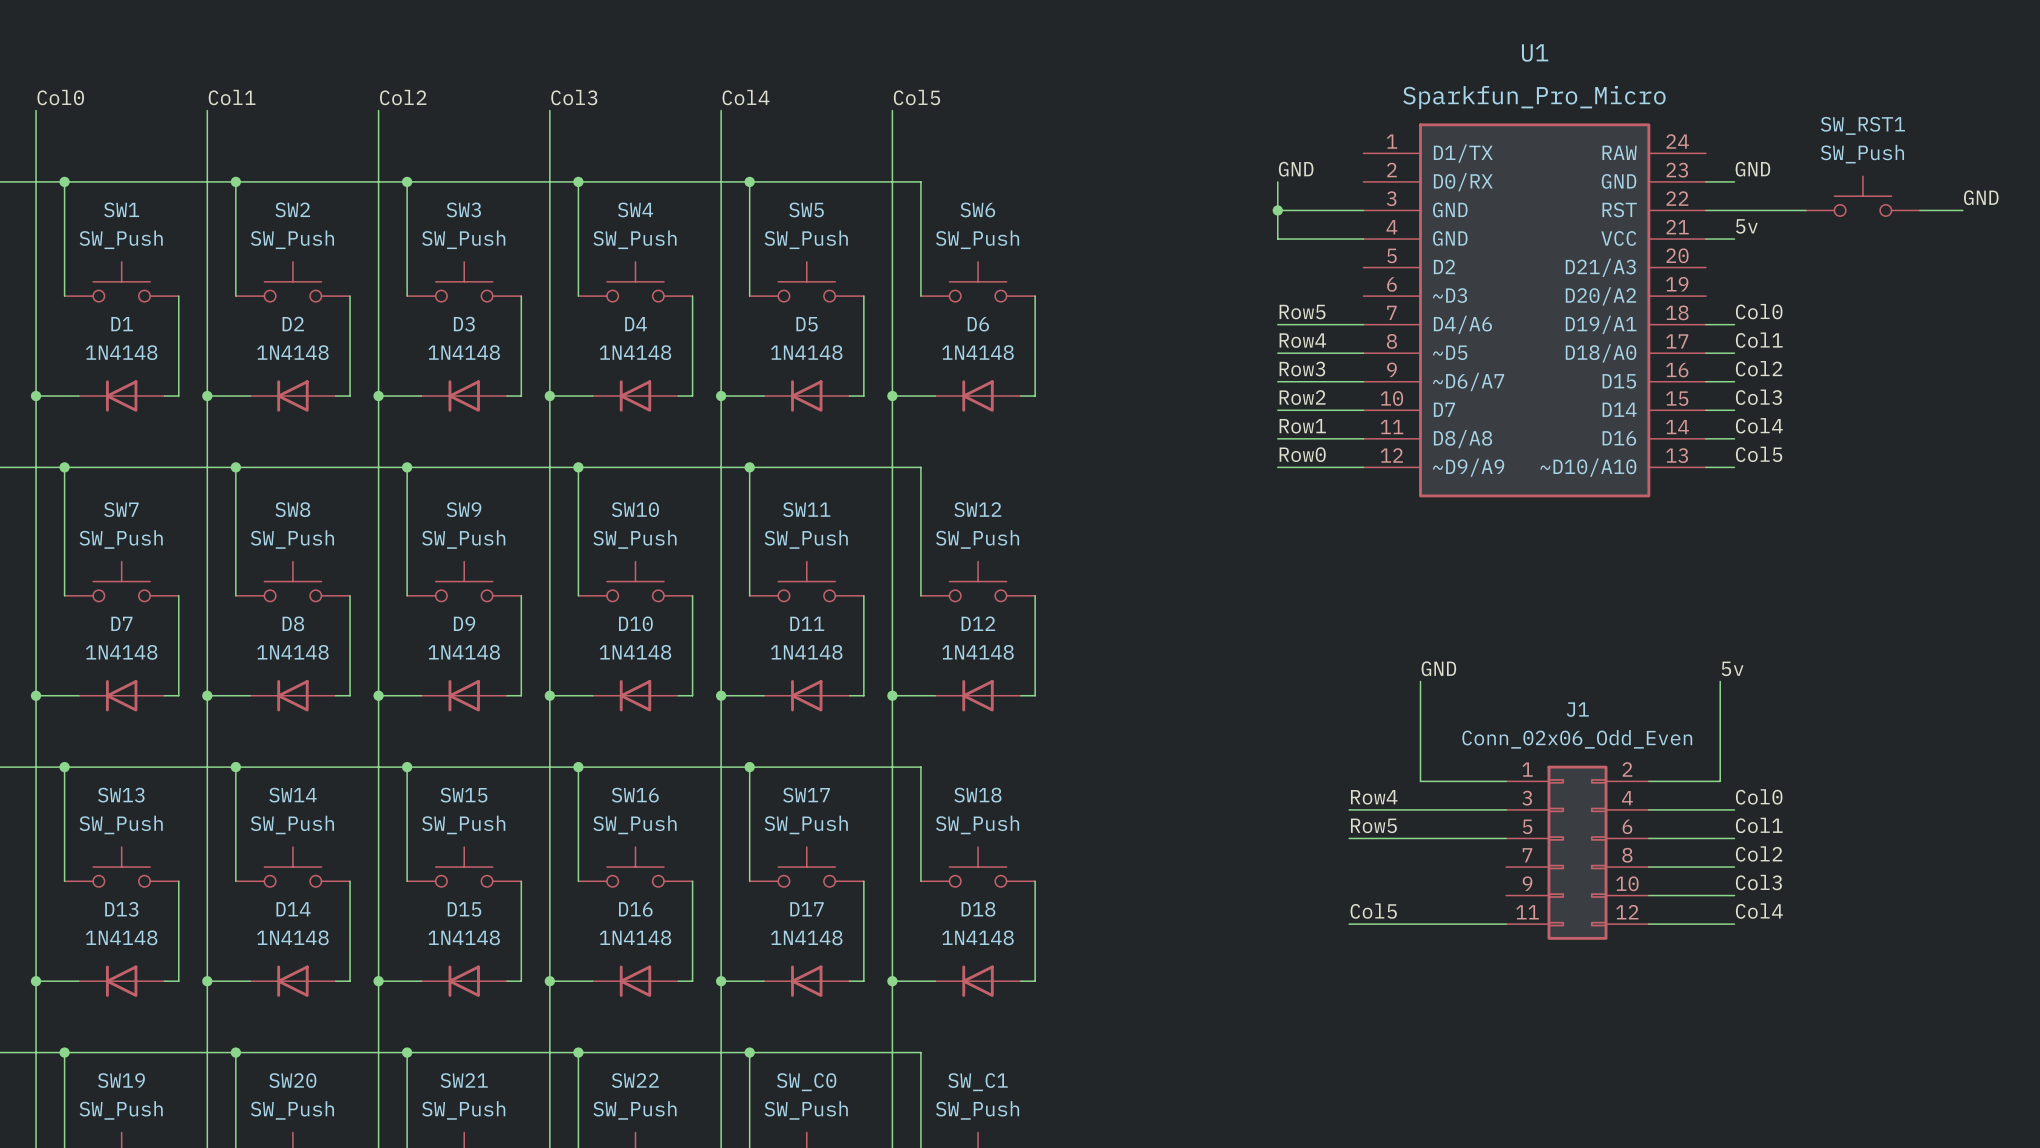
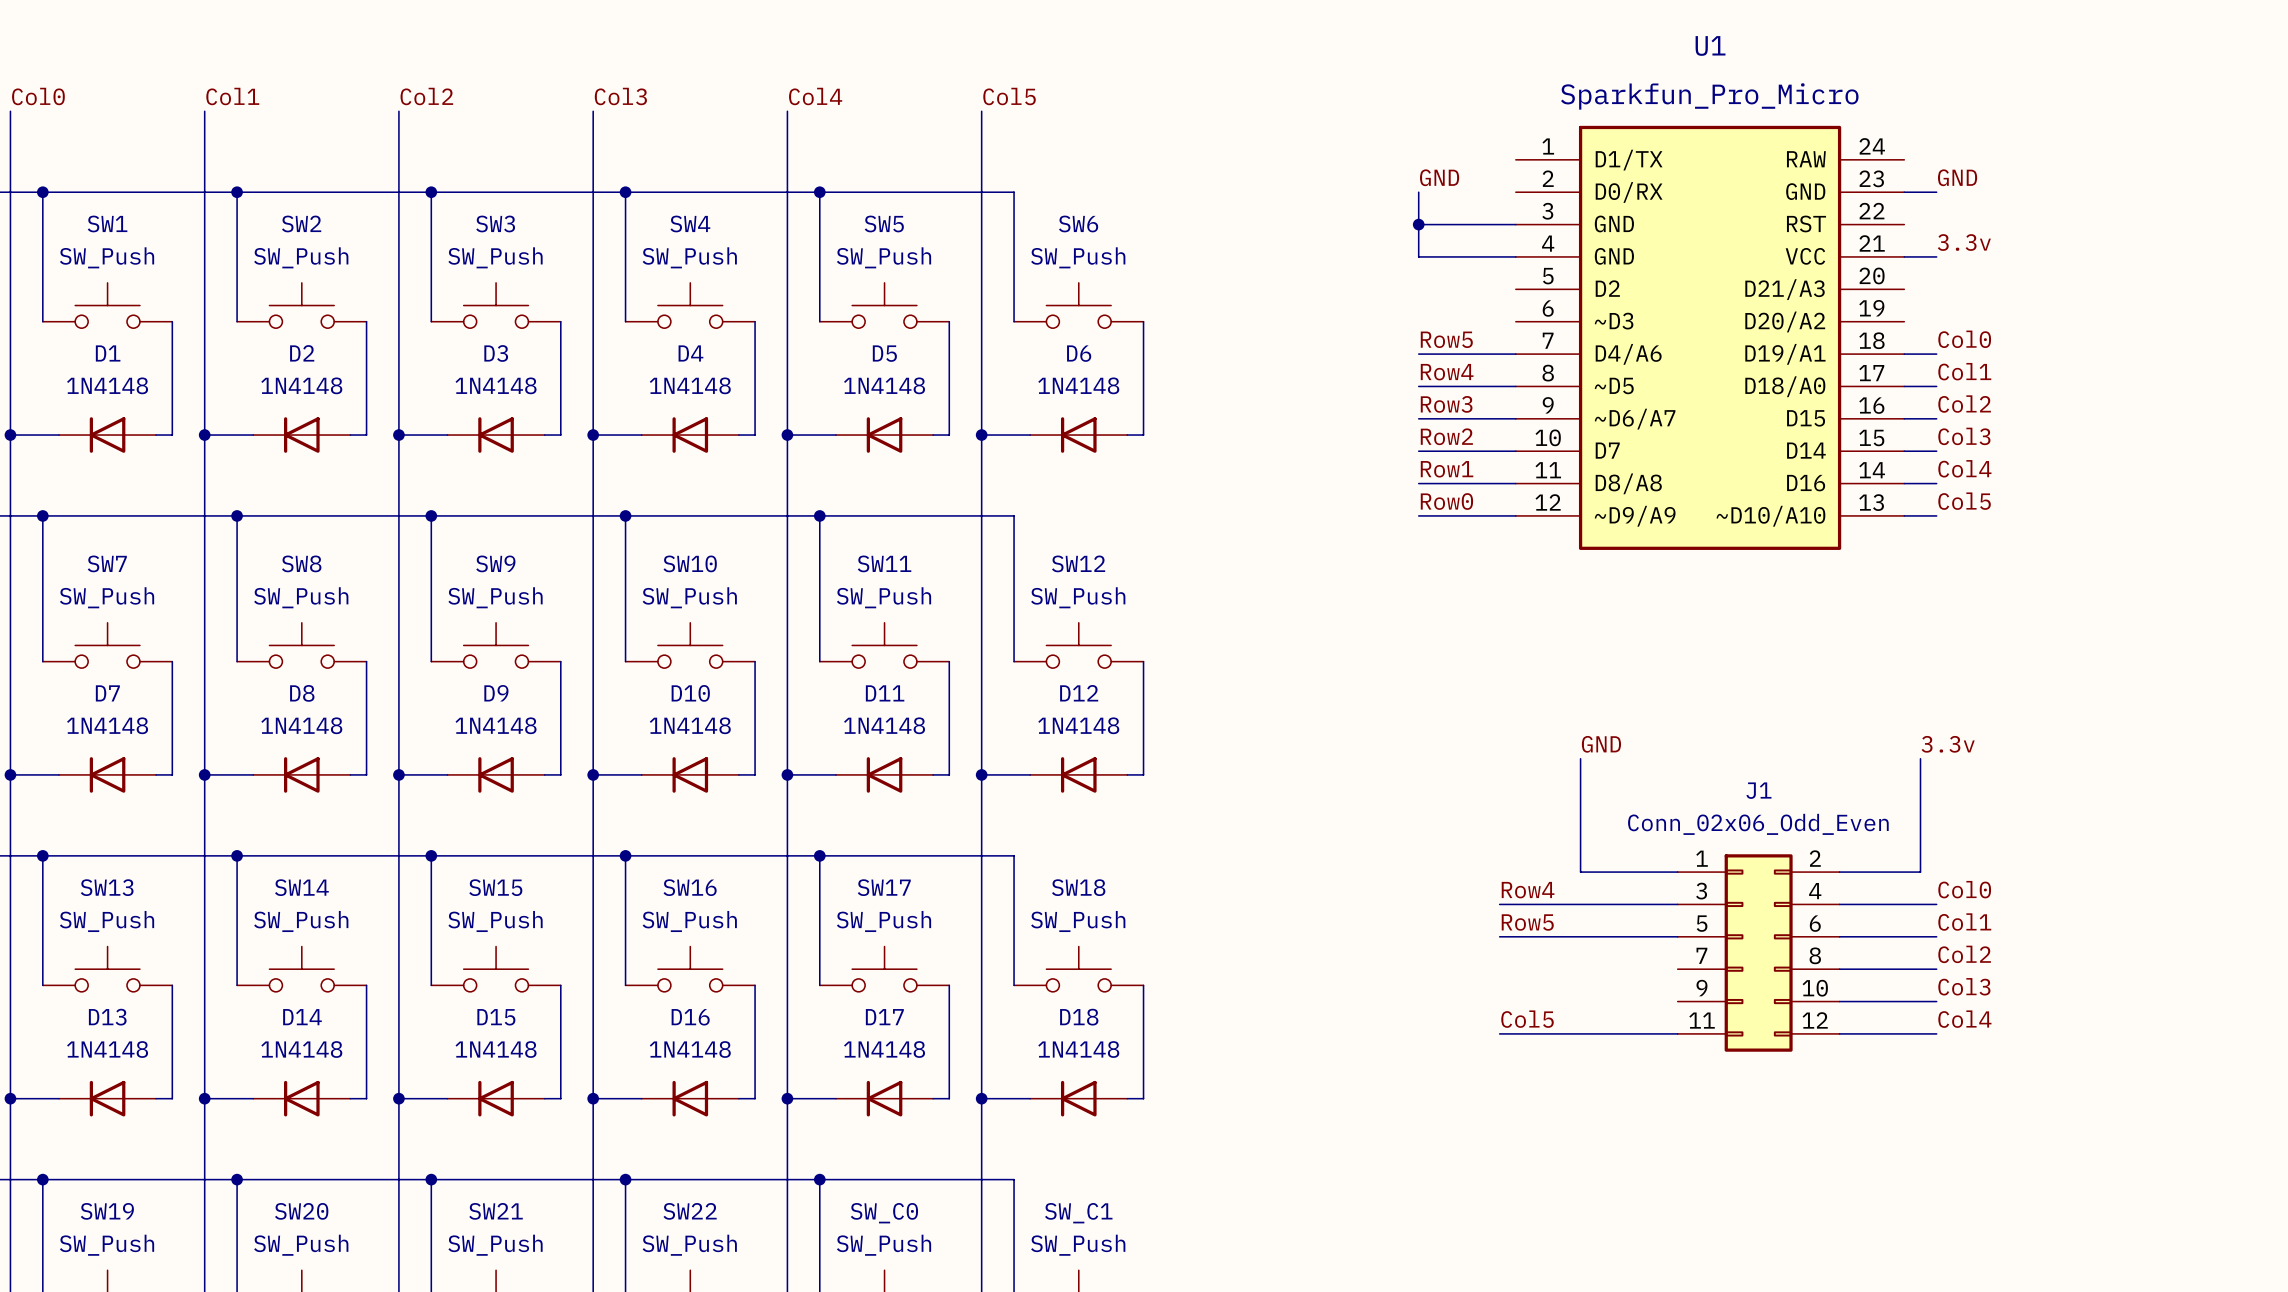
SW_RST1: SW_Push (1862, 196) -> none
label: GND (1981, 197) -> none
wire: (1705, 210) (1805, 210) -> none
wire: (1920, 210) (1962, 210) -> none
label: 5v (1746, 226) -> 3.3v (1964, 242)
label: 5v (1732, 668) -> 3.3v (1948, 744)

